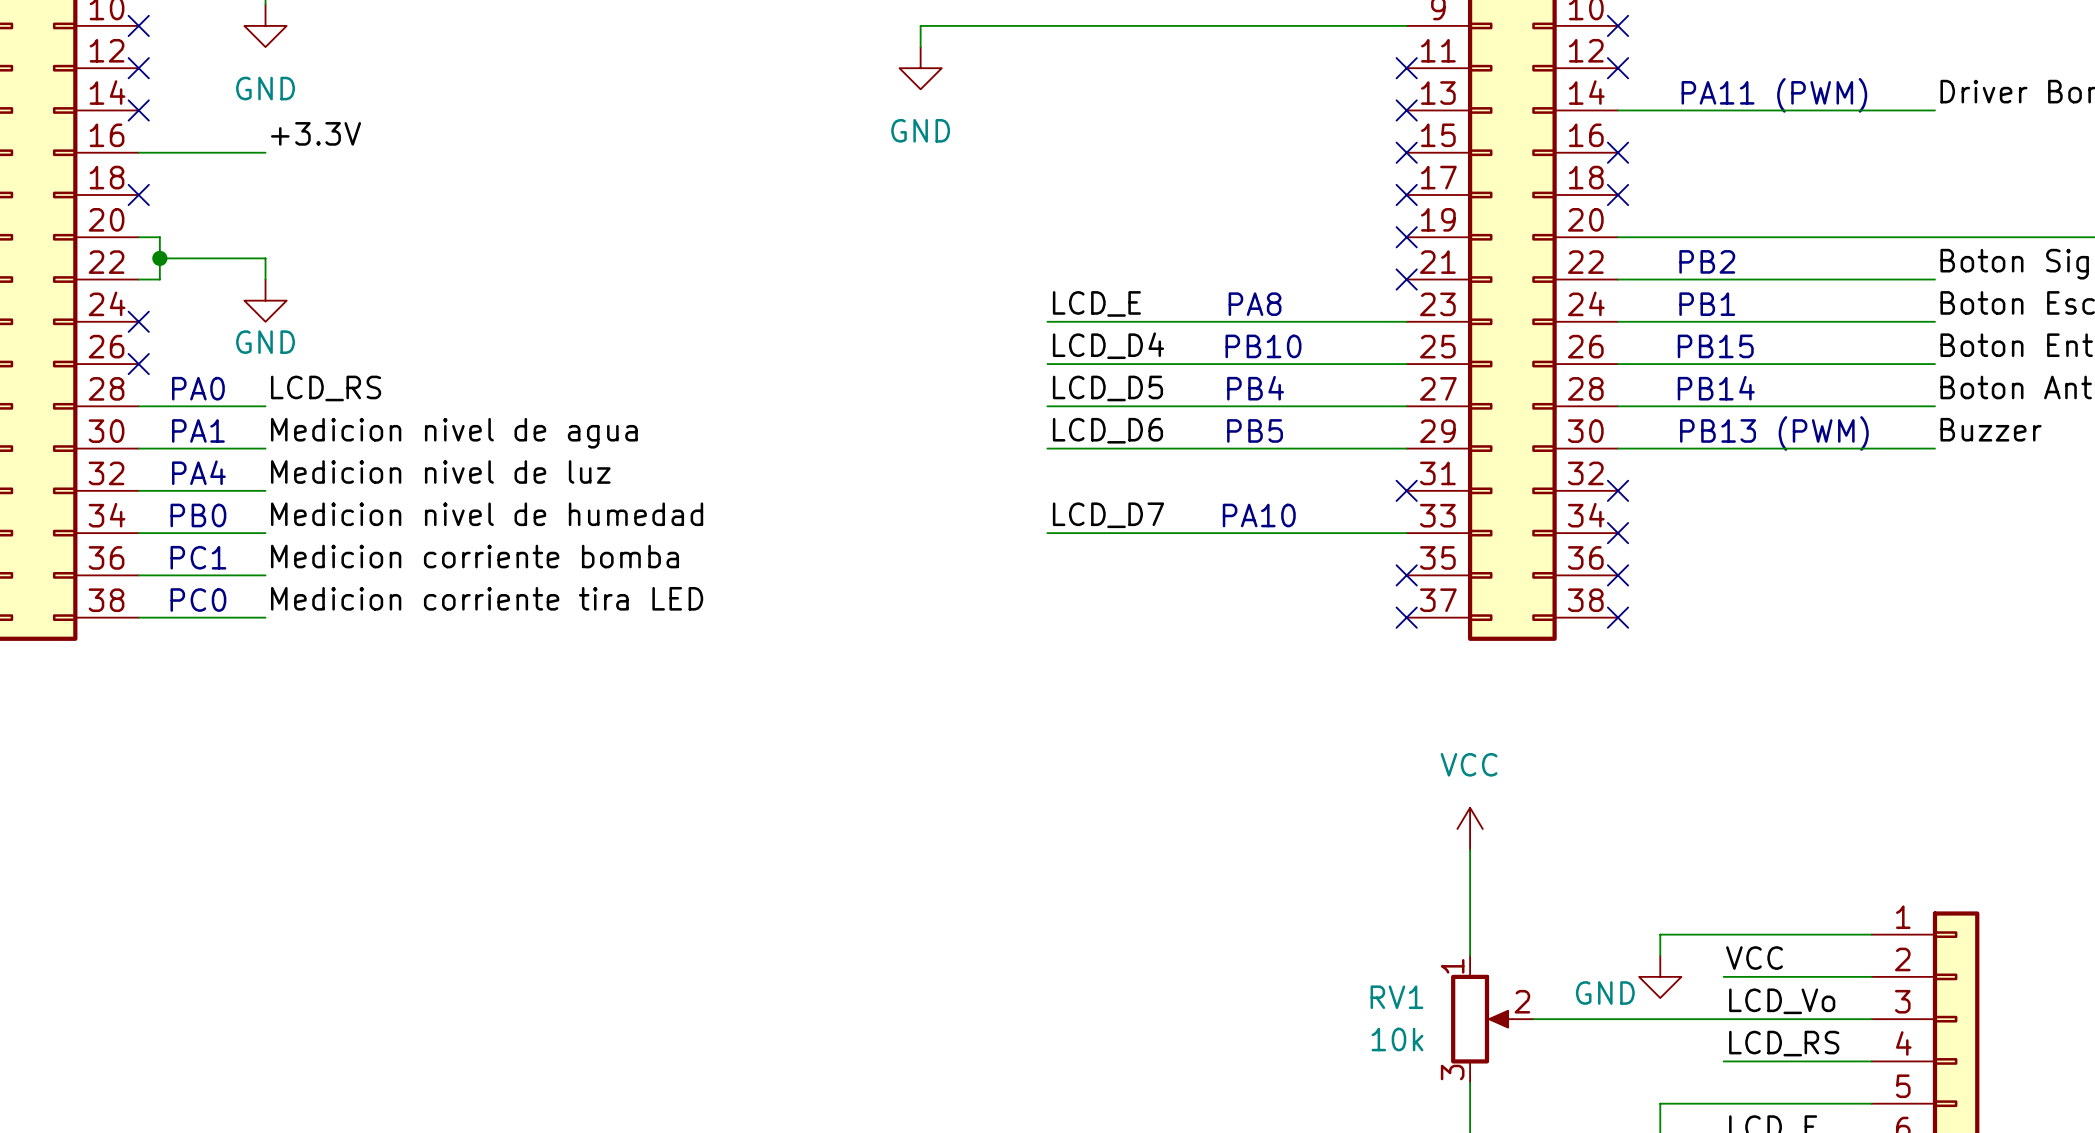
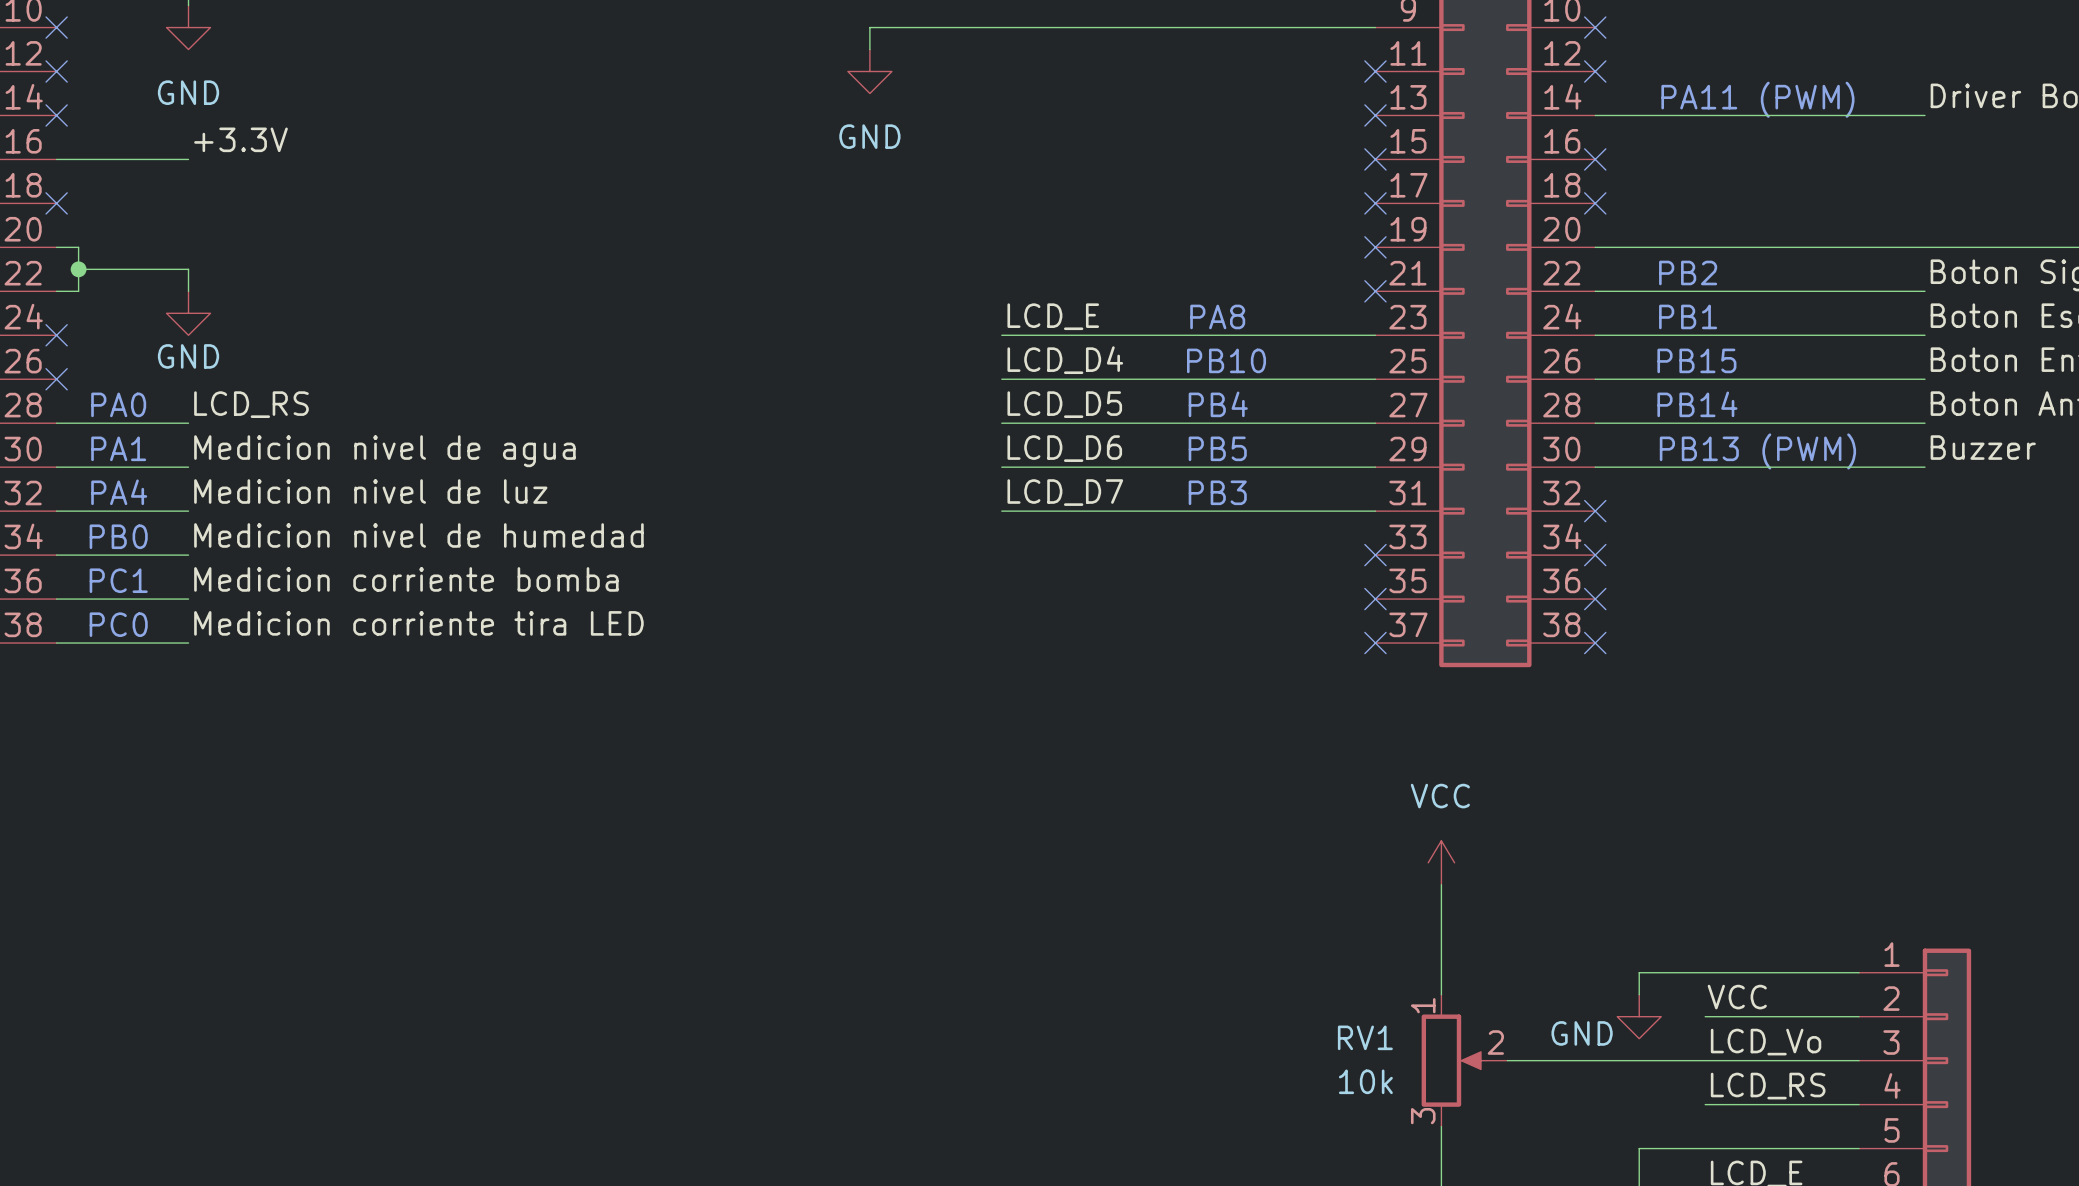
text: none -> PB3 (1217, 492)
no-connect mark position: (1406, 490) -> (1375, 555)
label position: LCD_D7 (1108, 515) -> LCD_D7 (1065, 492)
text: PA10 (1259, 515) -> none
wire: (1047, 533) (1406, 533) -> (1001, 511) (1375, 511)

